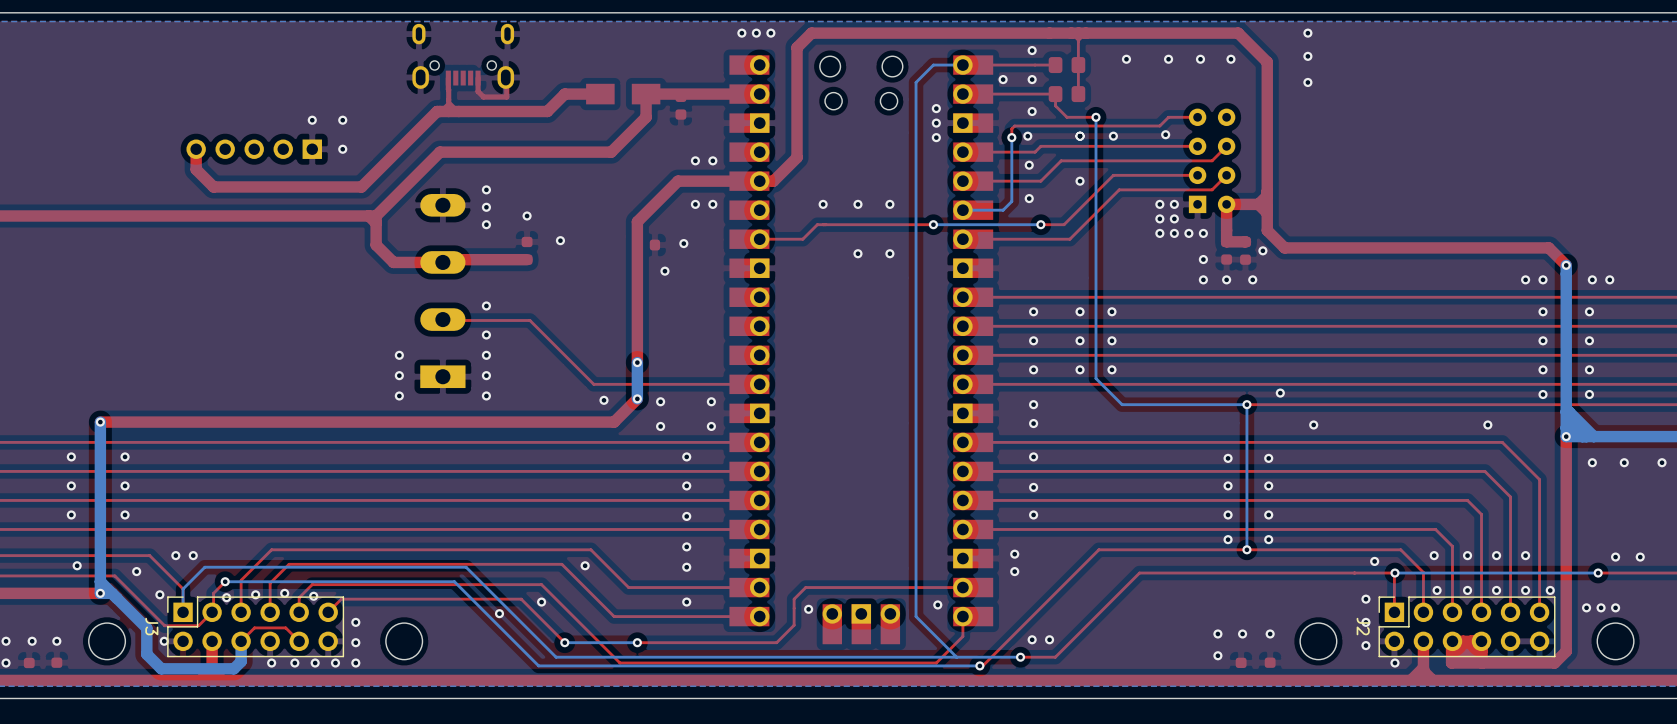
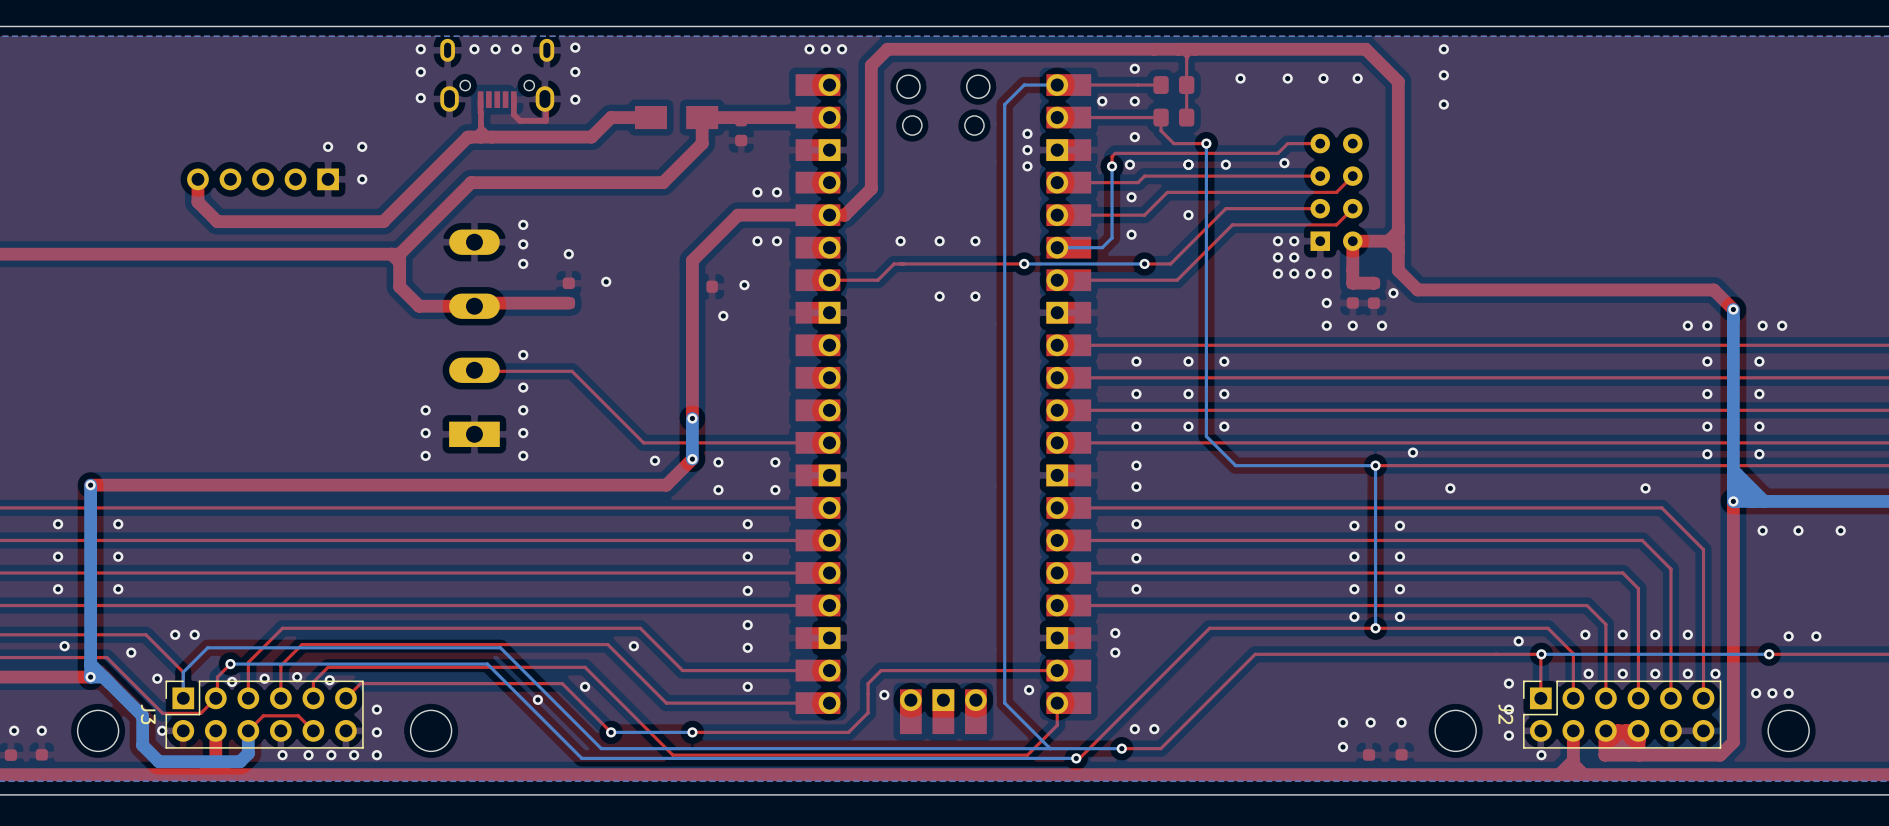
via: none -> (575, 47)
via: none -> (420, 49)
via: none -> (474, 49)
via: none -> (495, 49)
via: none -> (516, 49)
via: none -> (420, 72)
via: none -> (575, 72)
via: none -> (420, 98)
via: none -> (575, 99)

